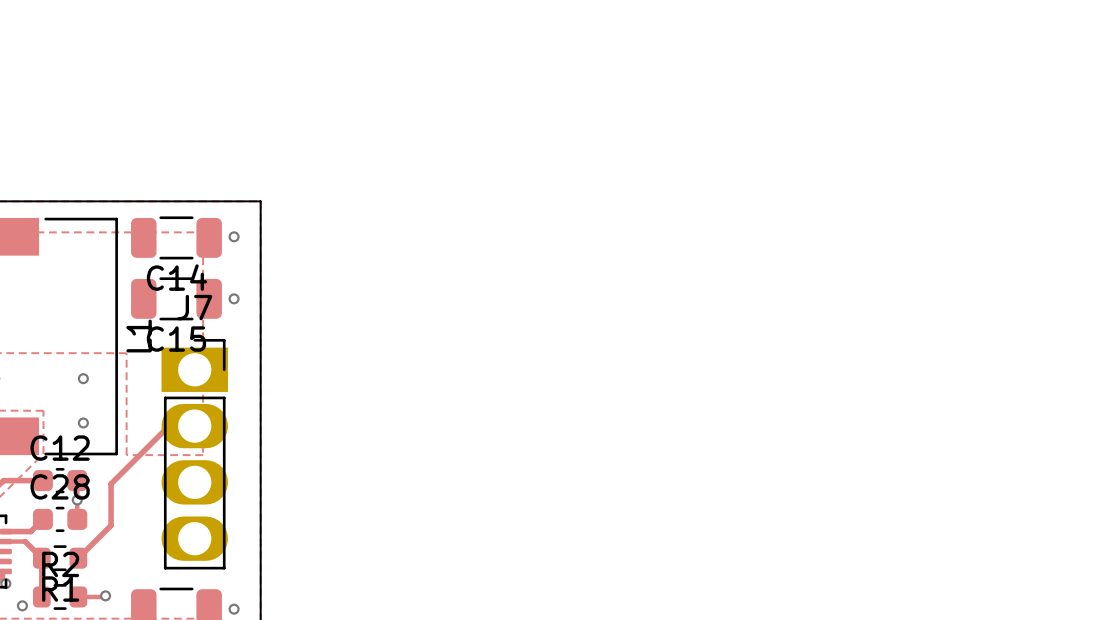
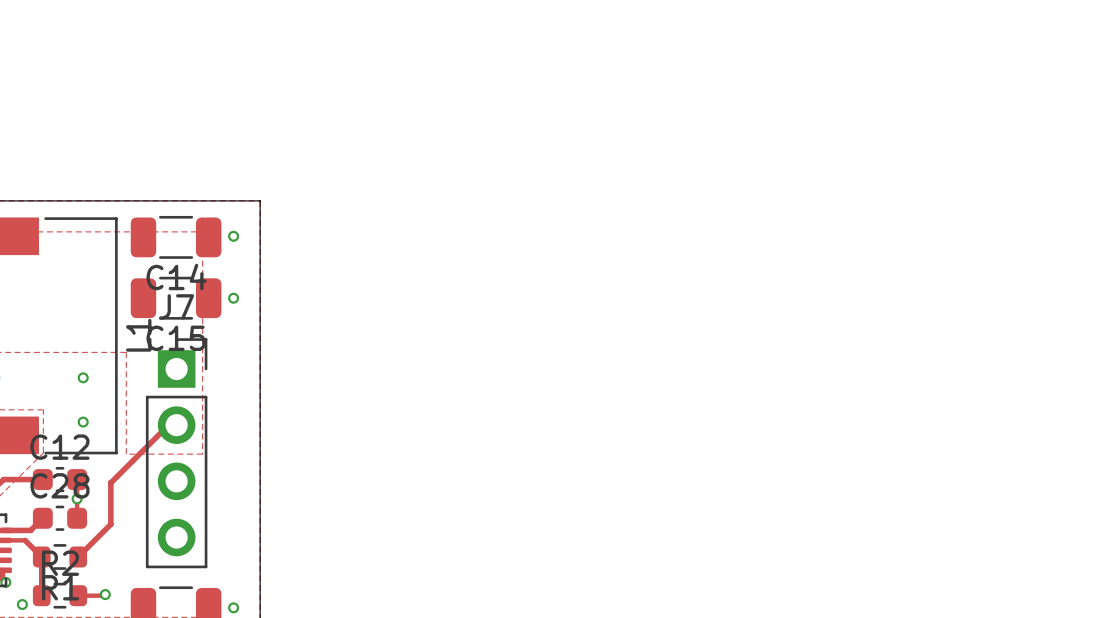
J7 footprint: [161, 338, 229, 570] -> [145, 338, 208, 569]

